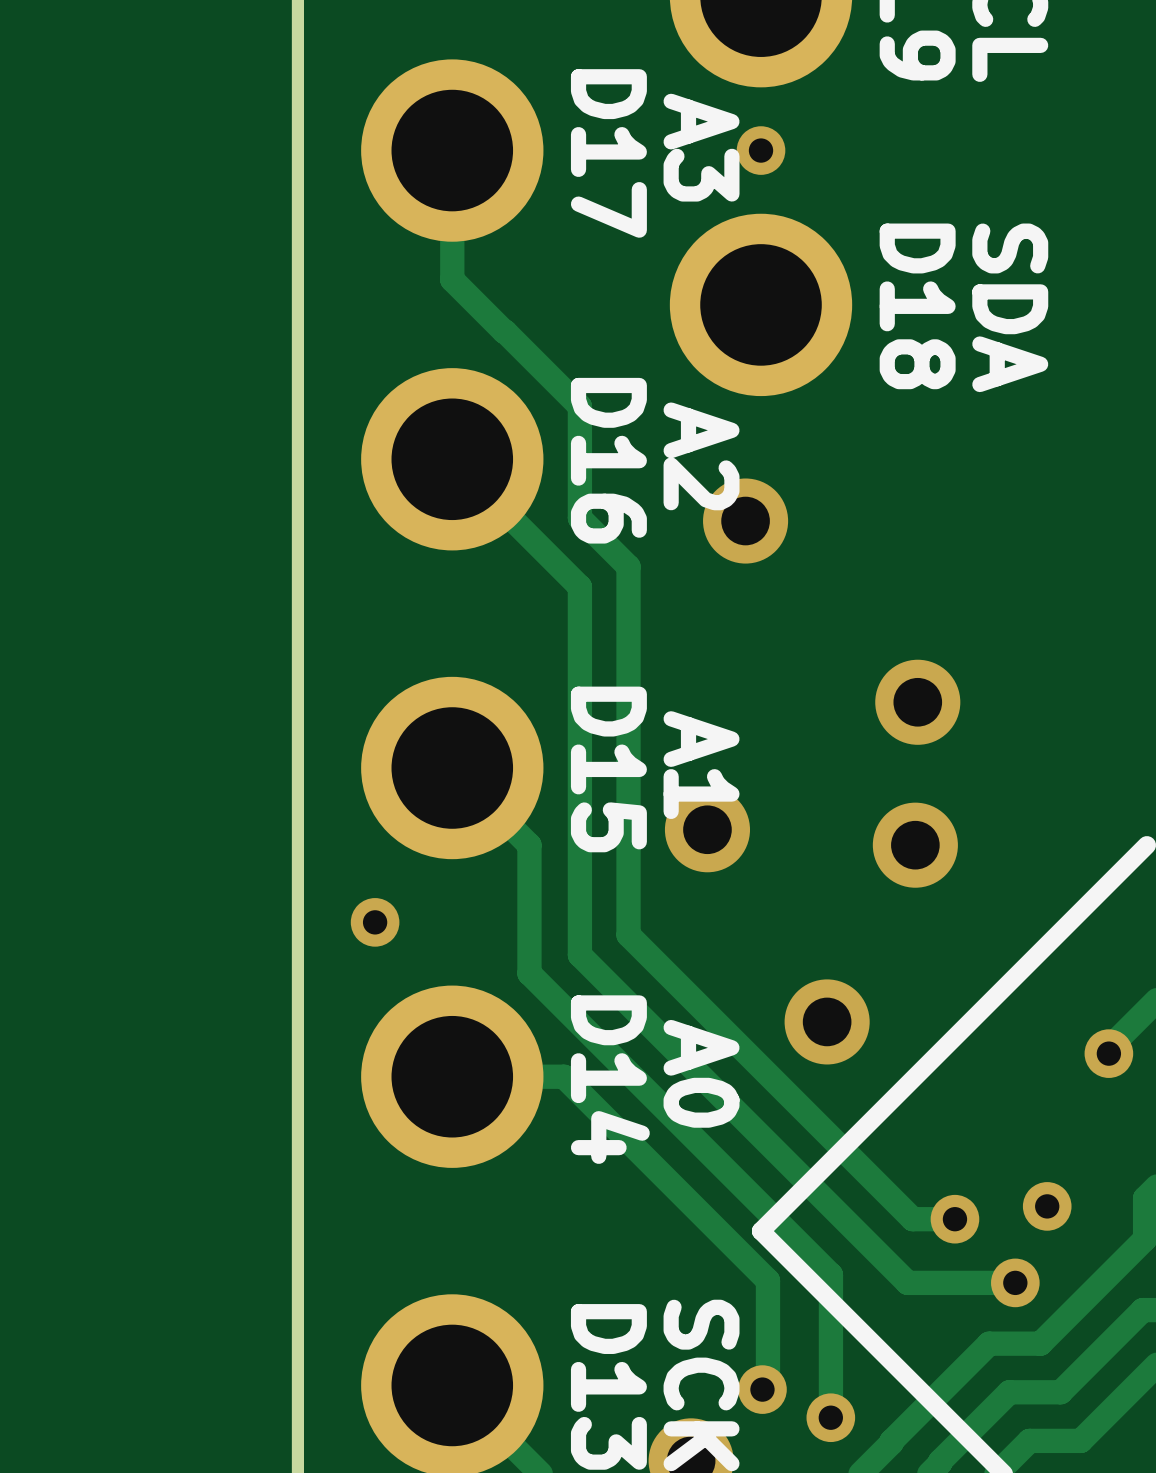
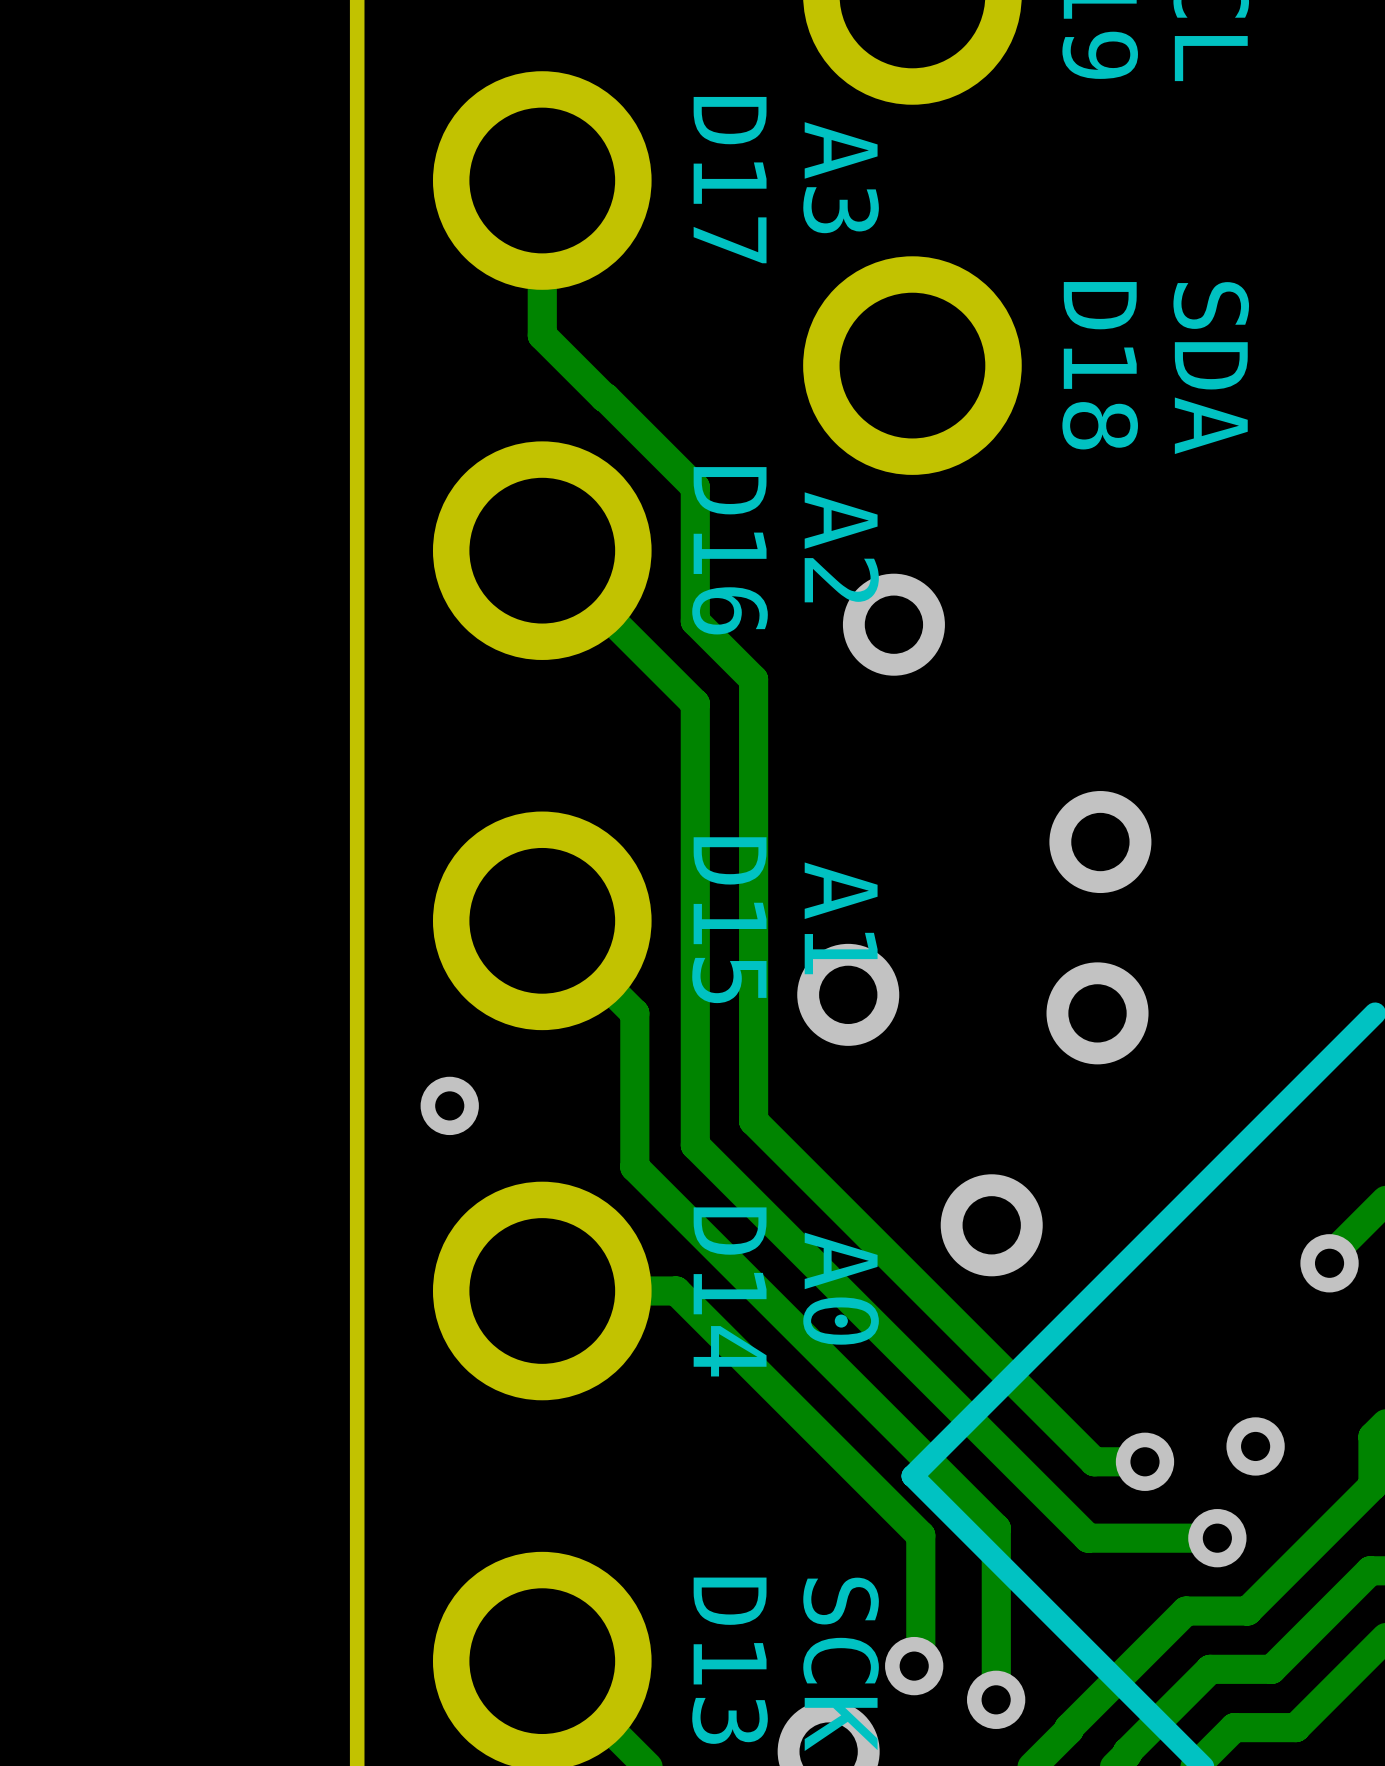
via: (761, 150) -> none

